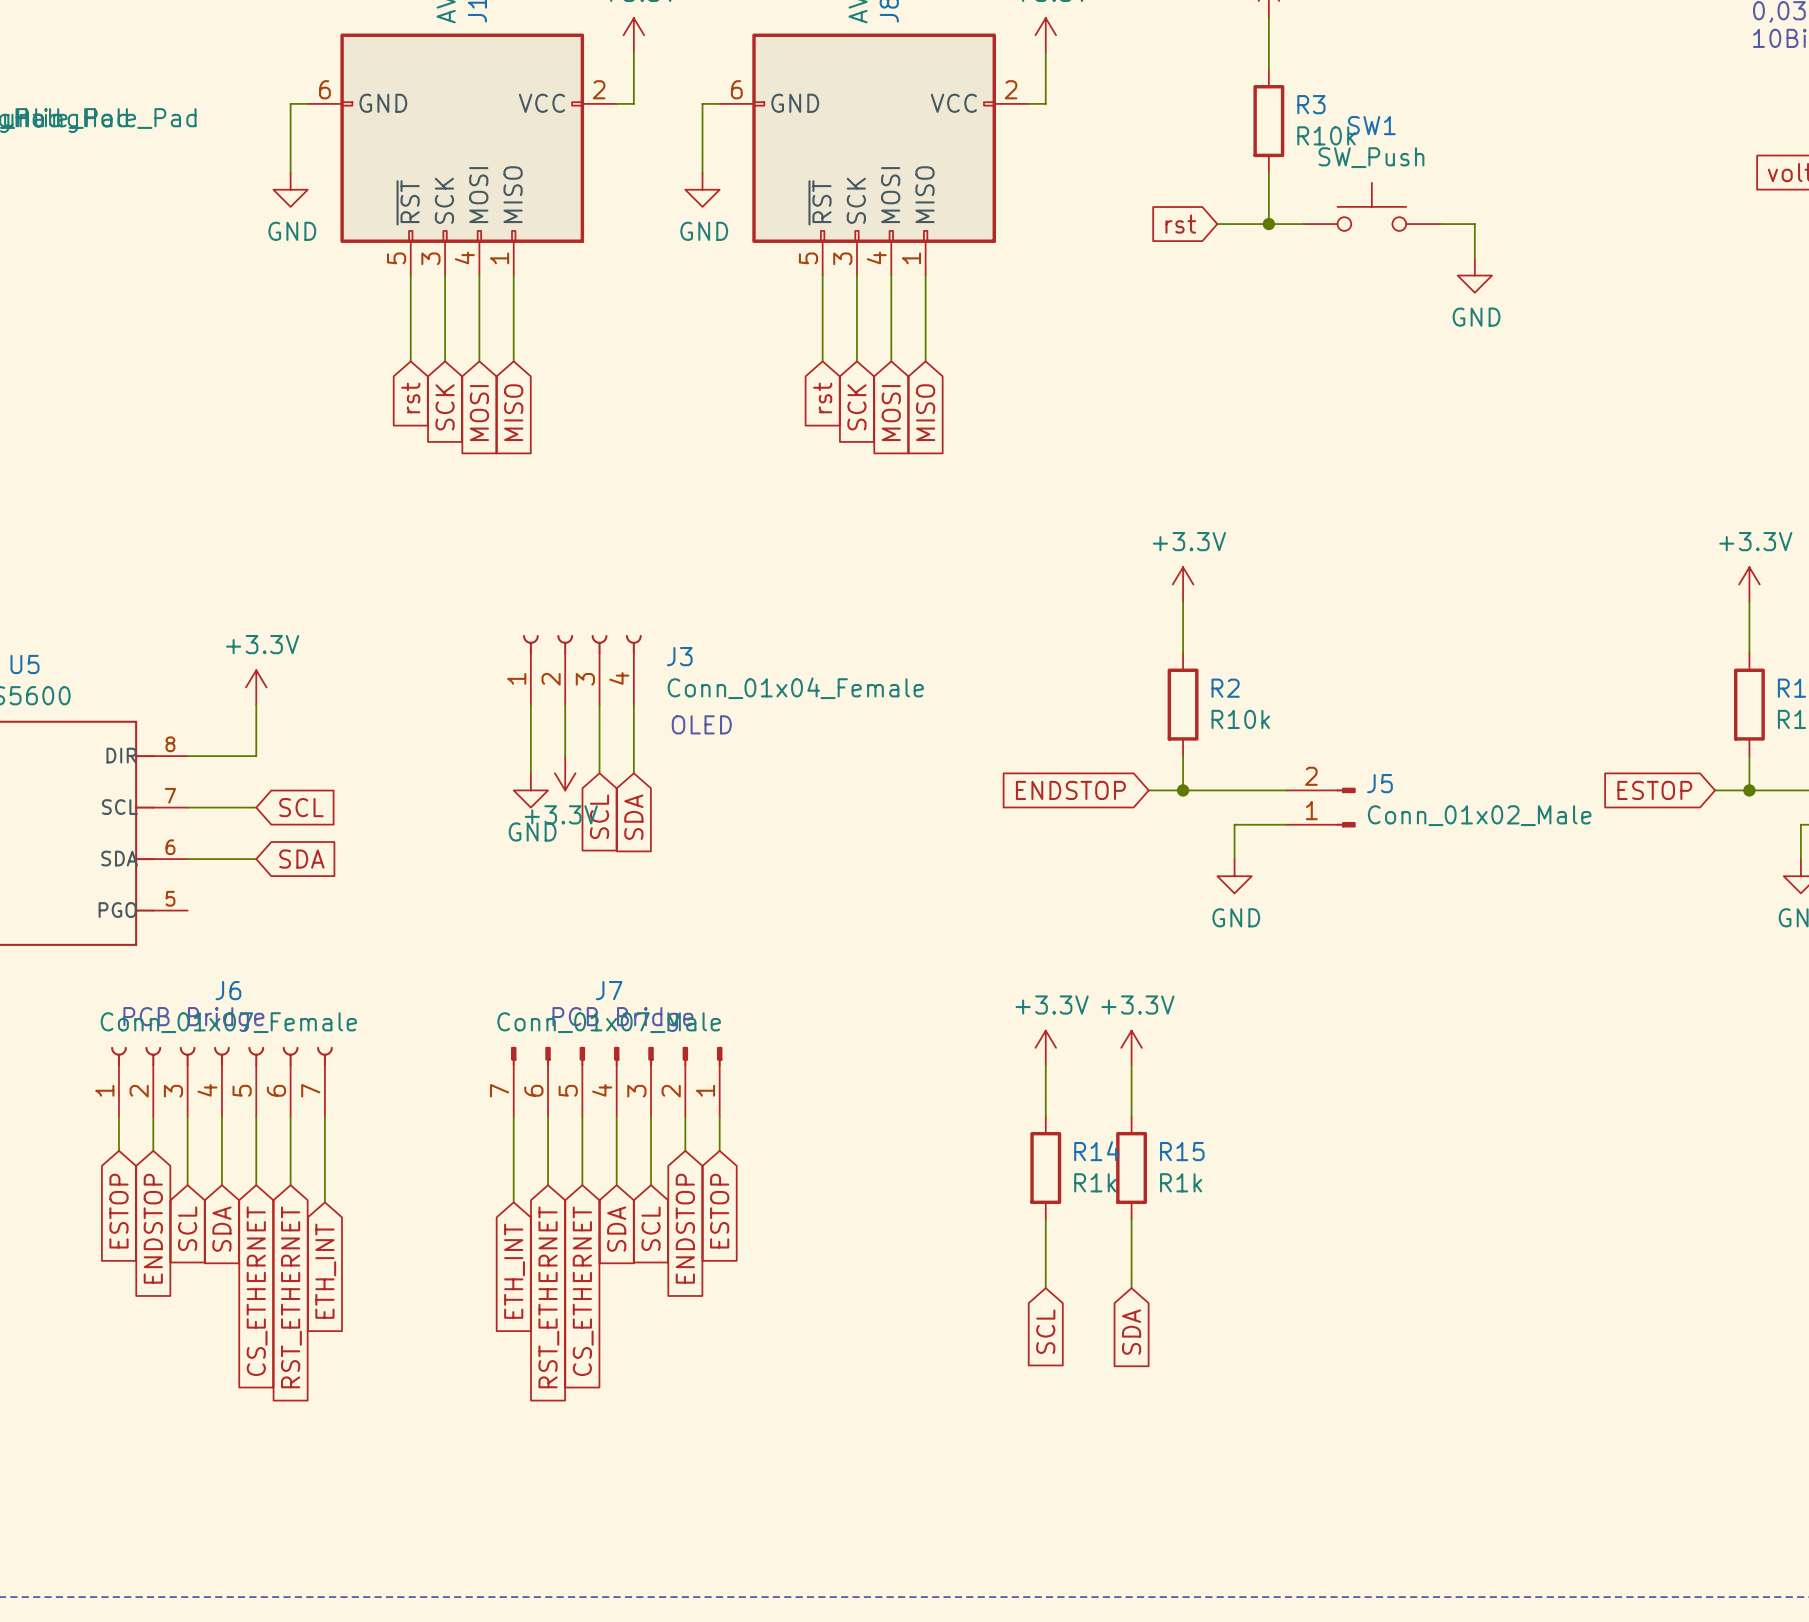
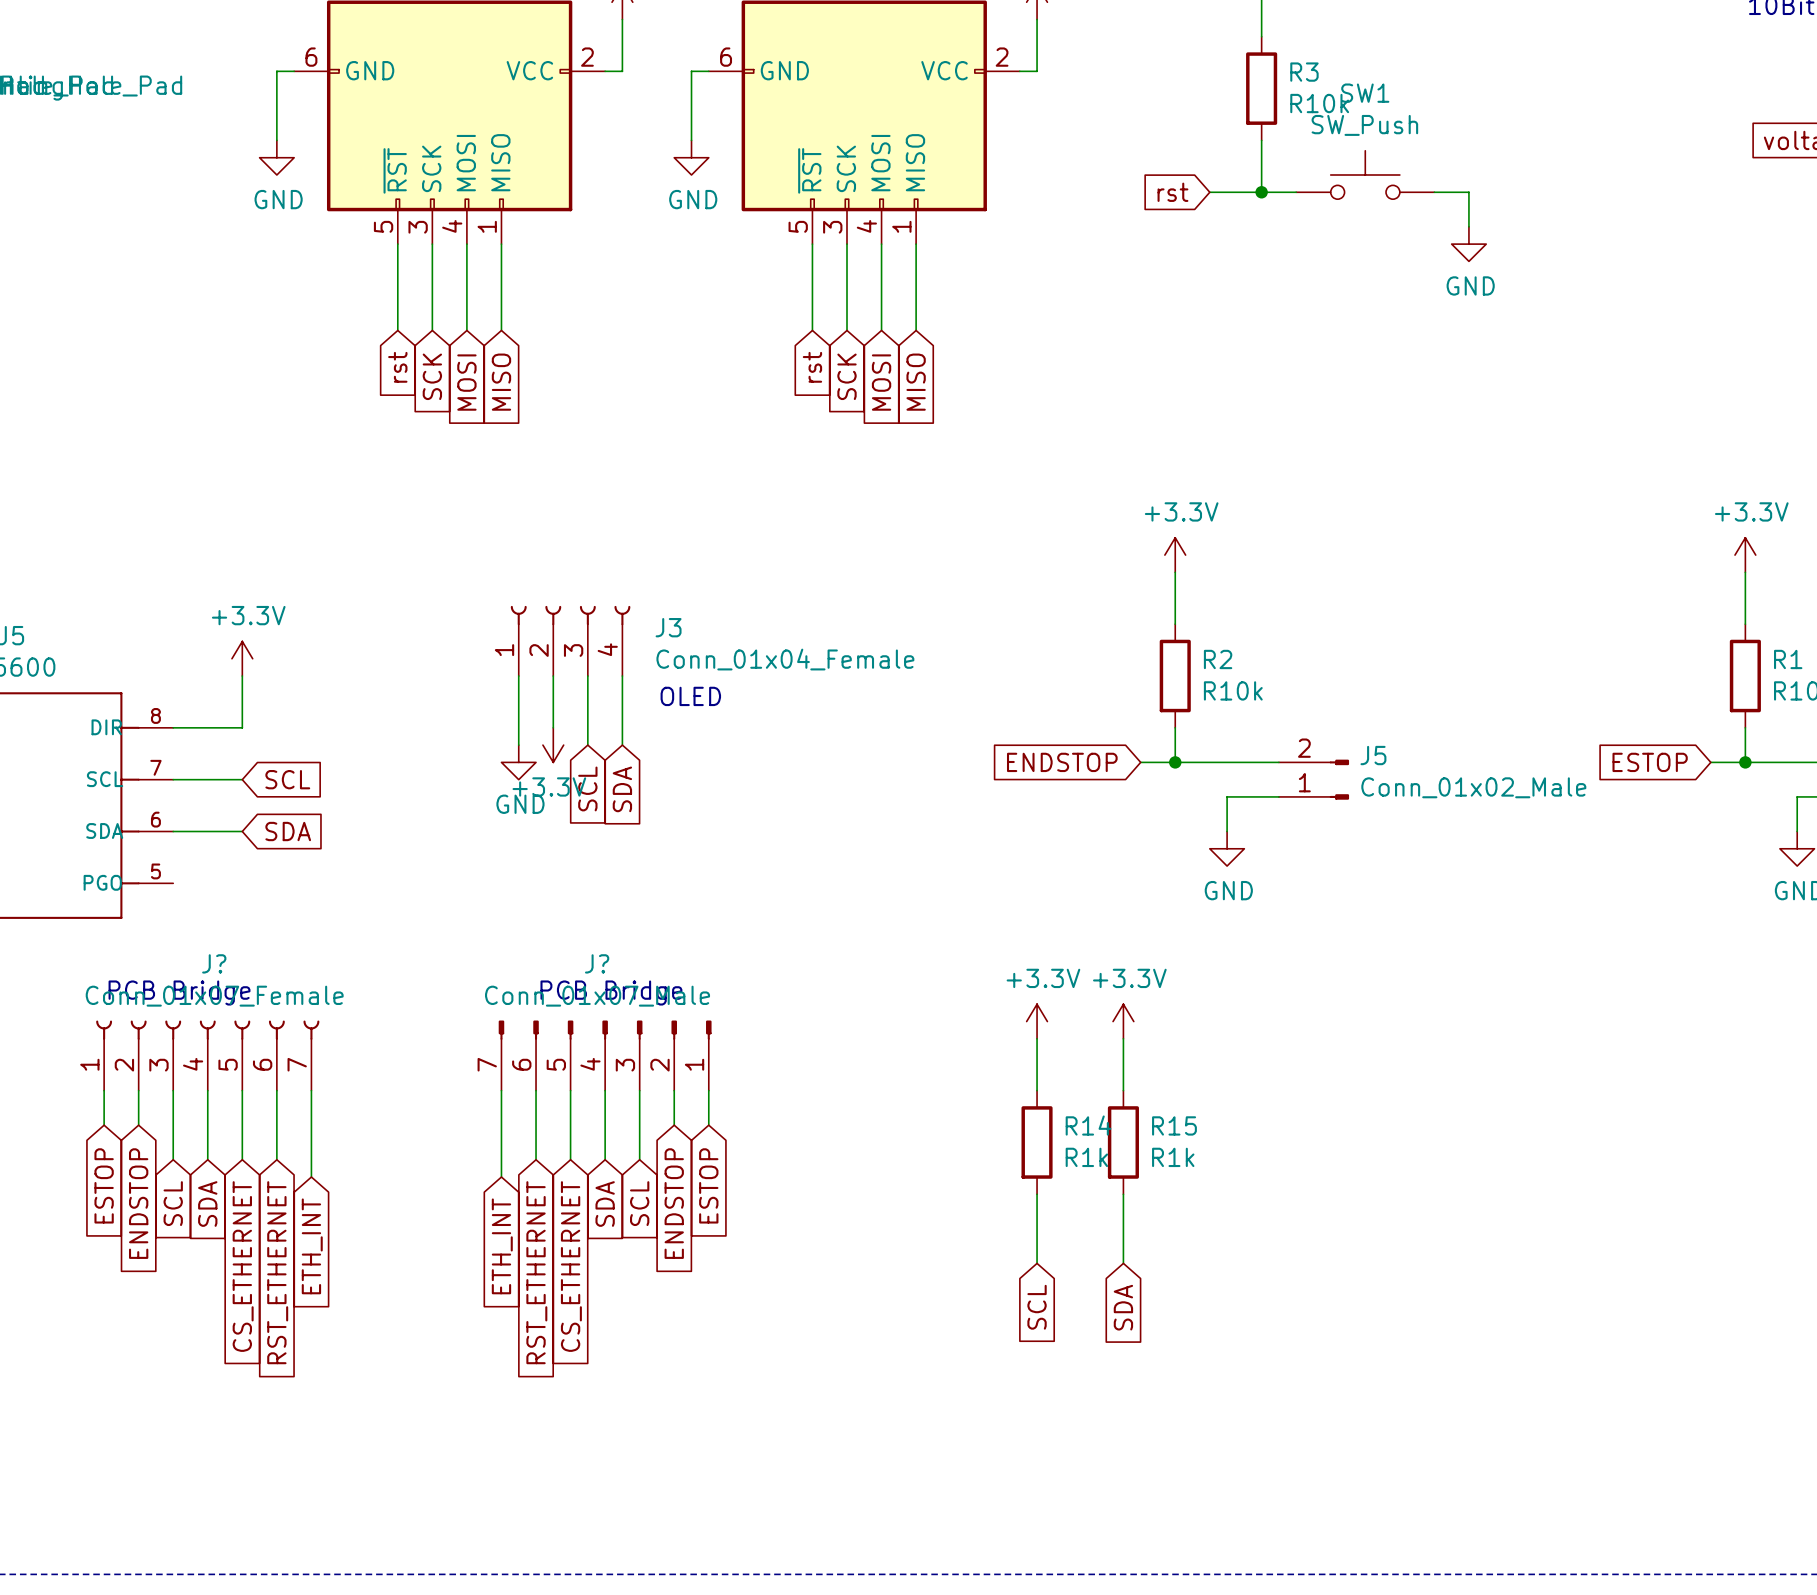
J6 name: J6 (228, 990) -> J? (214, 963)
J7 name: J7 (609, 990) -> J? (597, 963)

